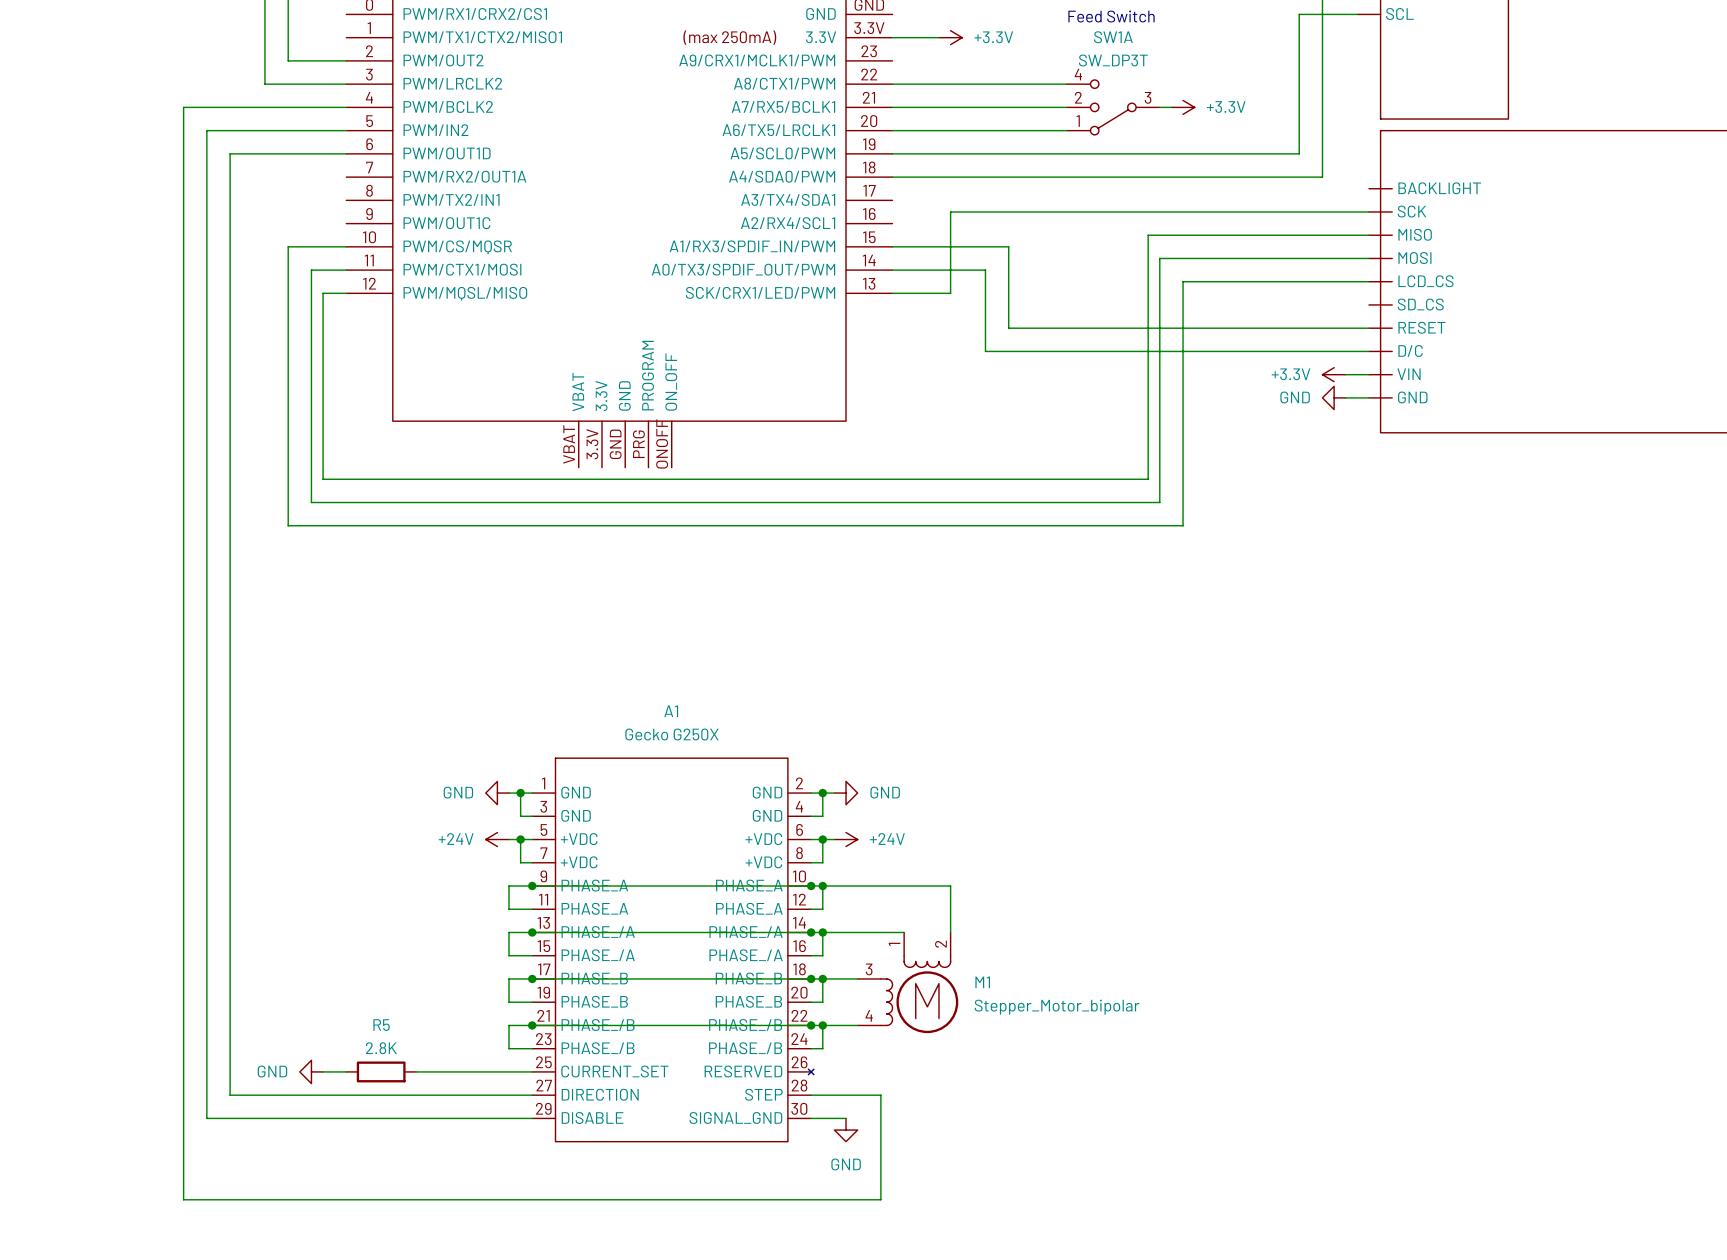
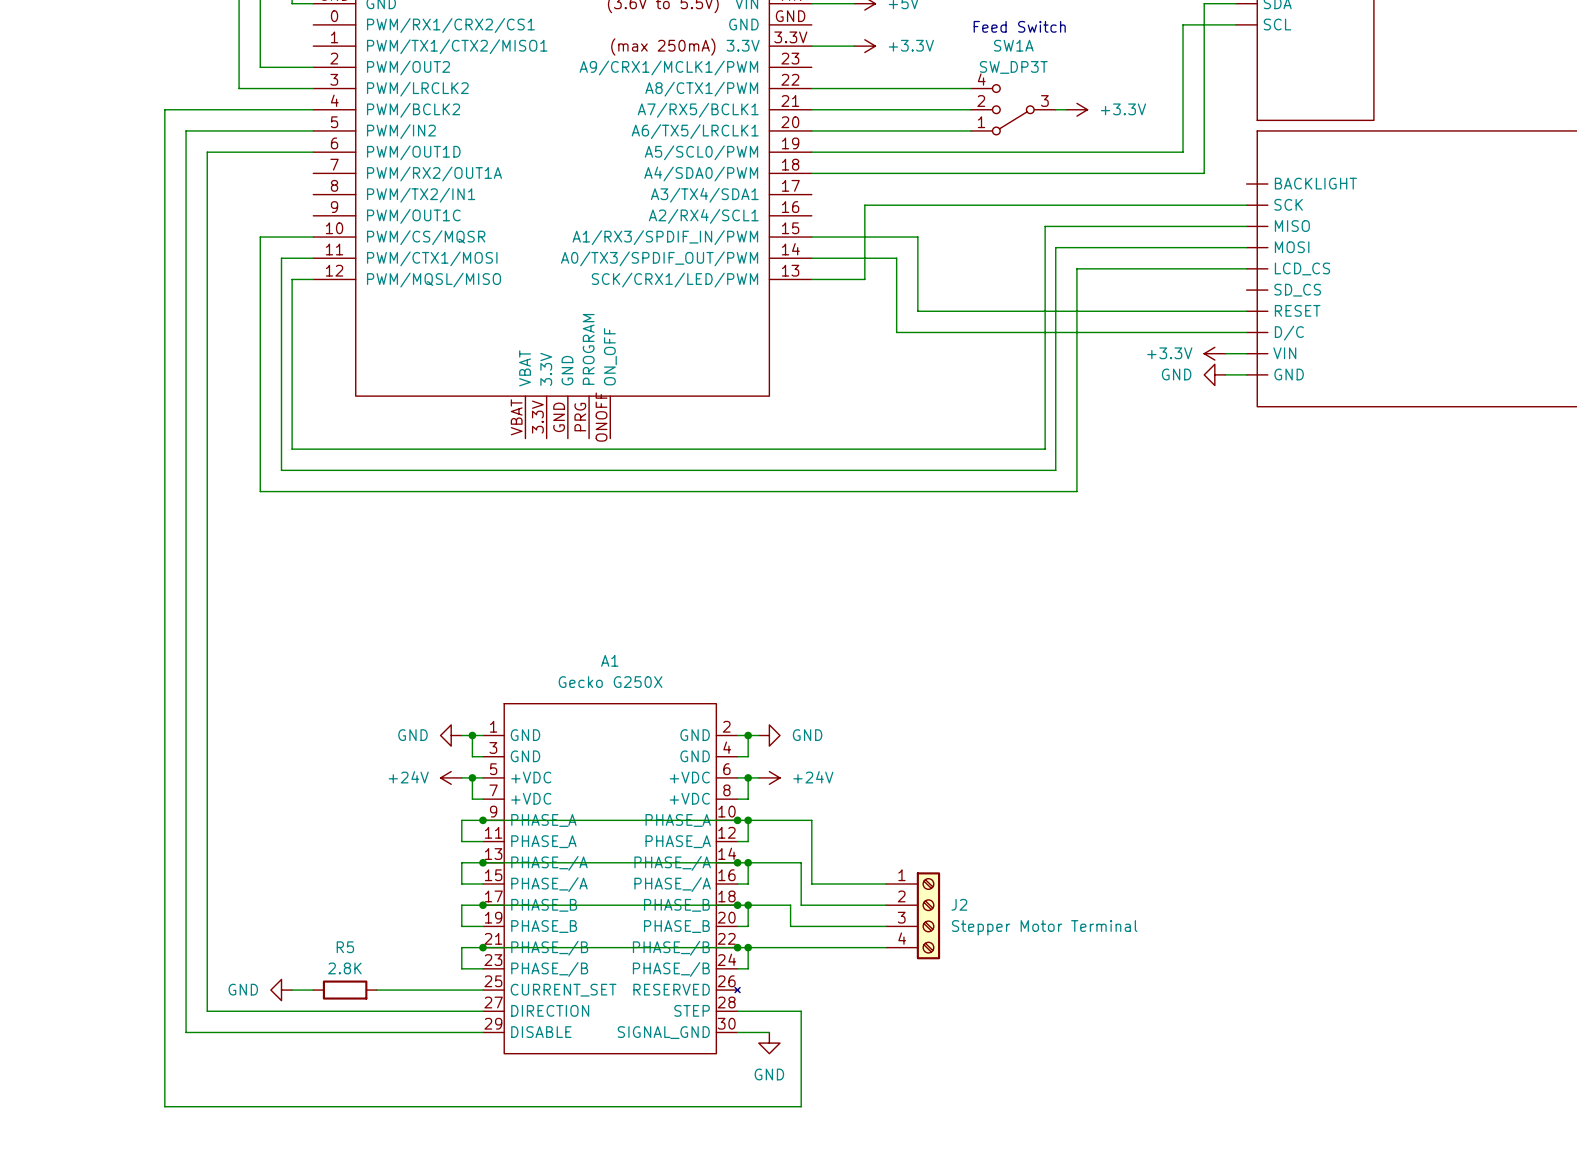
wire: (892, 886) (950, 886) (950, 932) -> (811, 820) (811, 883) (886, 883)
wire: (880, 932) (904, 932) -> (801, 862) (801, 905) (886, 905)
wire: none -> (779, 905) (790, 905) (790, 926) (886, 926)
M1: Stepper_Motor_bipolar (907, 982) -> none
J2: none -> Stepper Motor Terminal (913, 915)
wire: none -> (779, 947) (886, 947)

